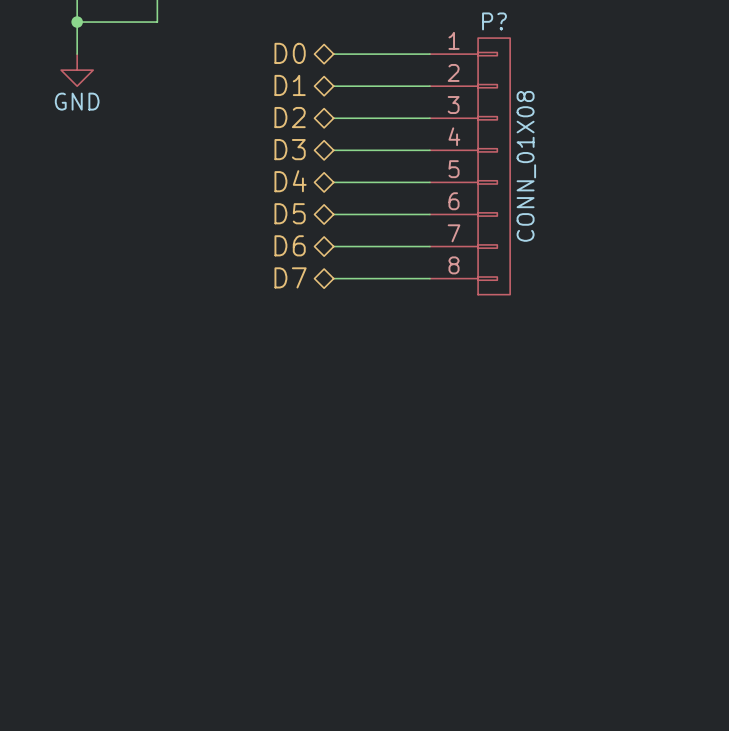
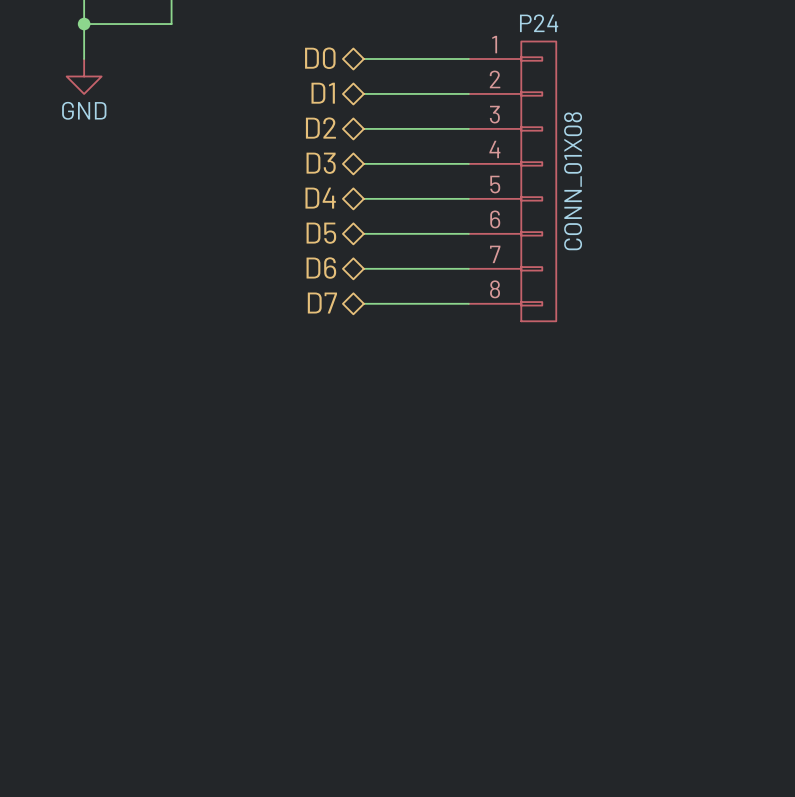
P? name: P? (494, 21) -> P24 (539, 23)

